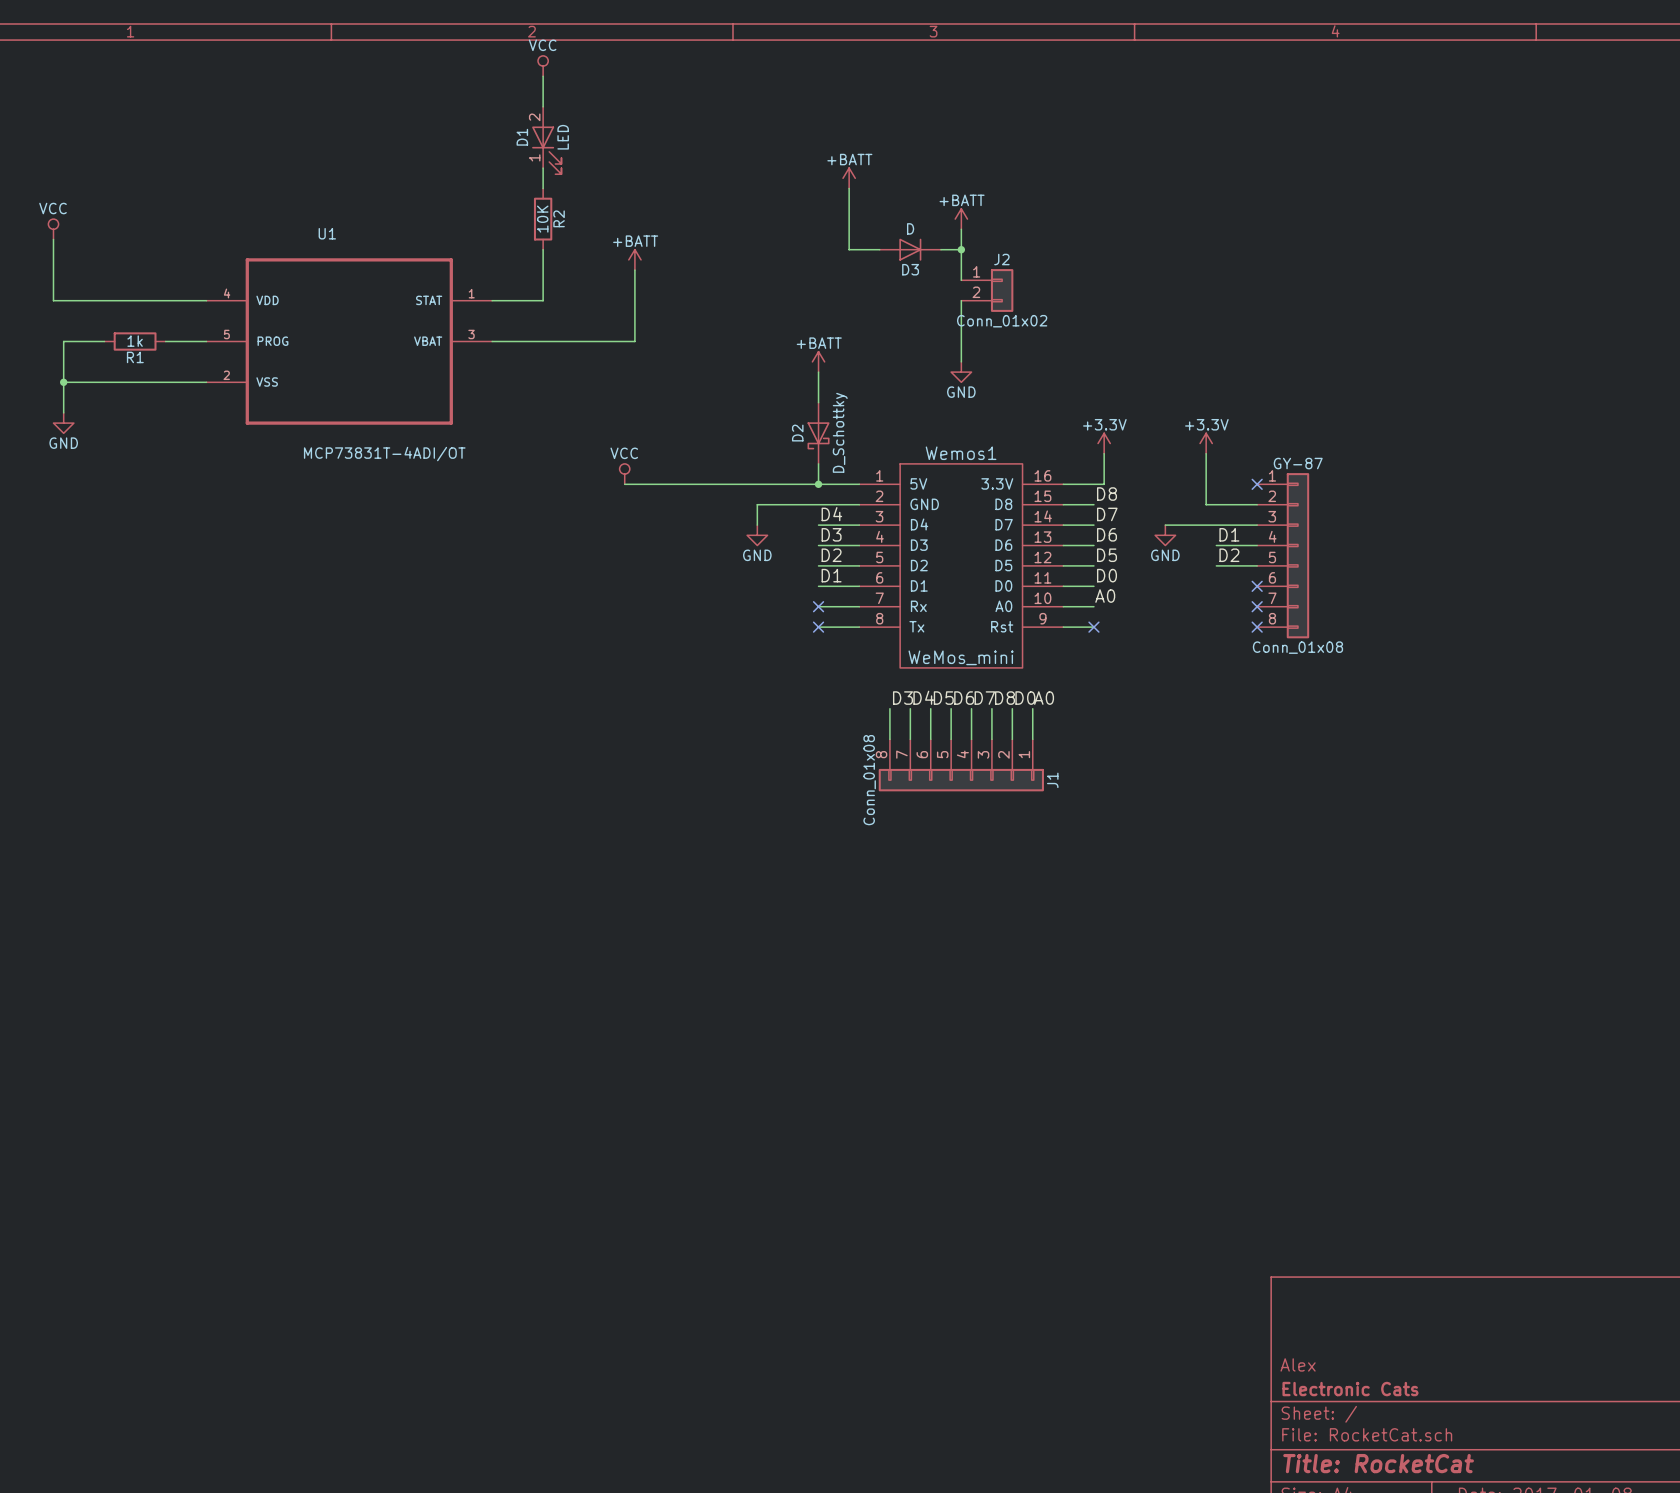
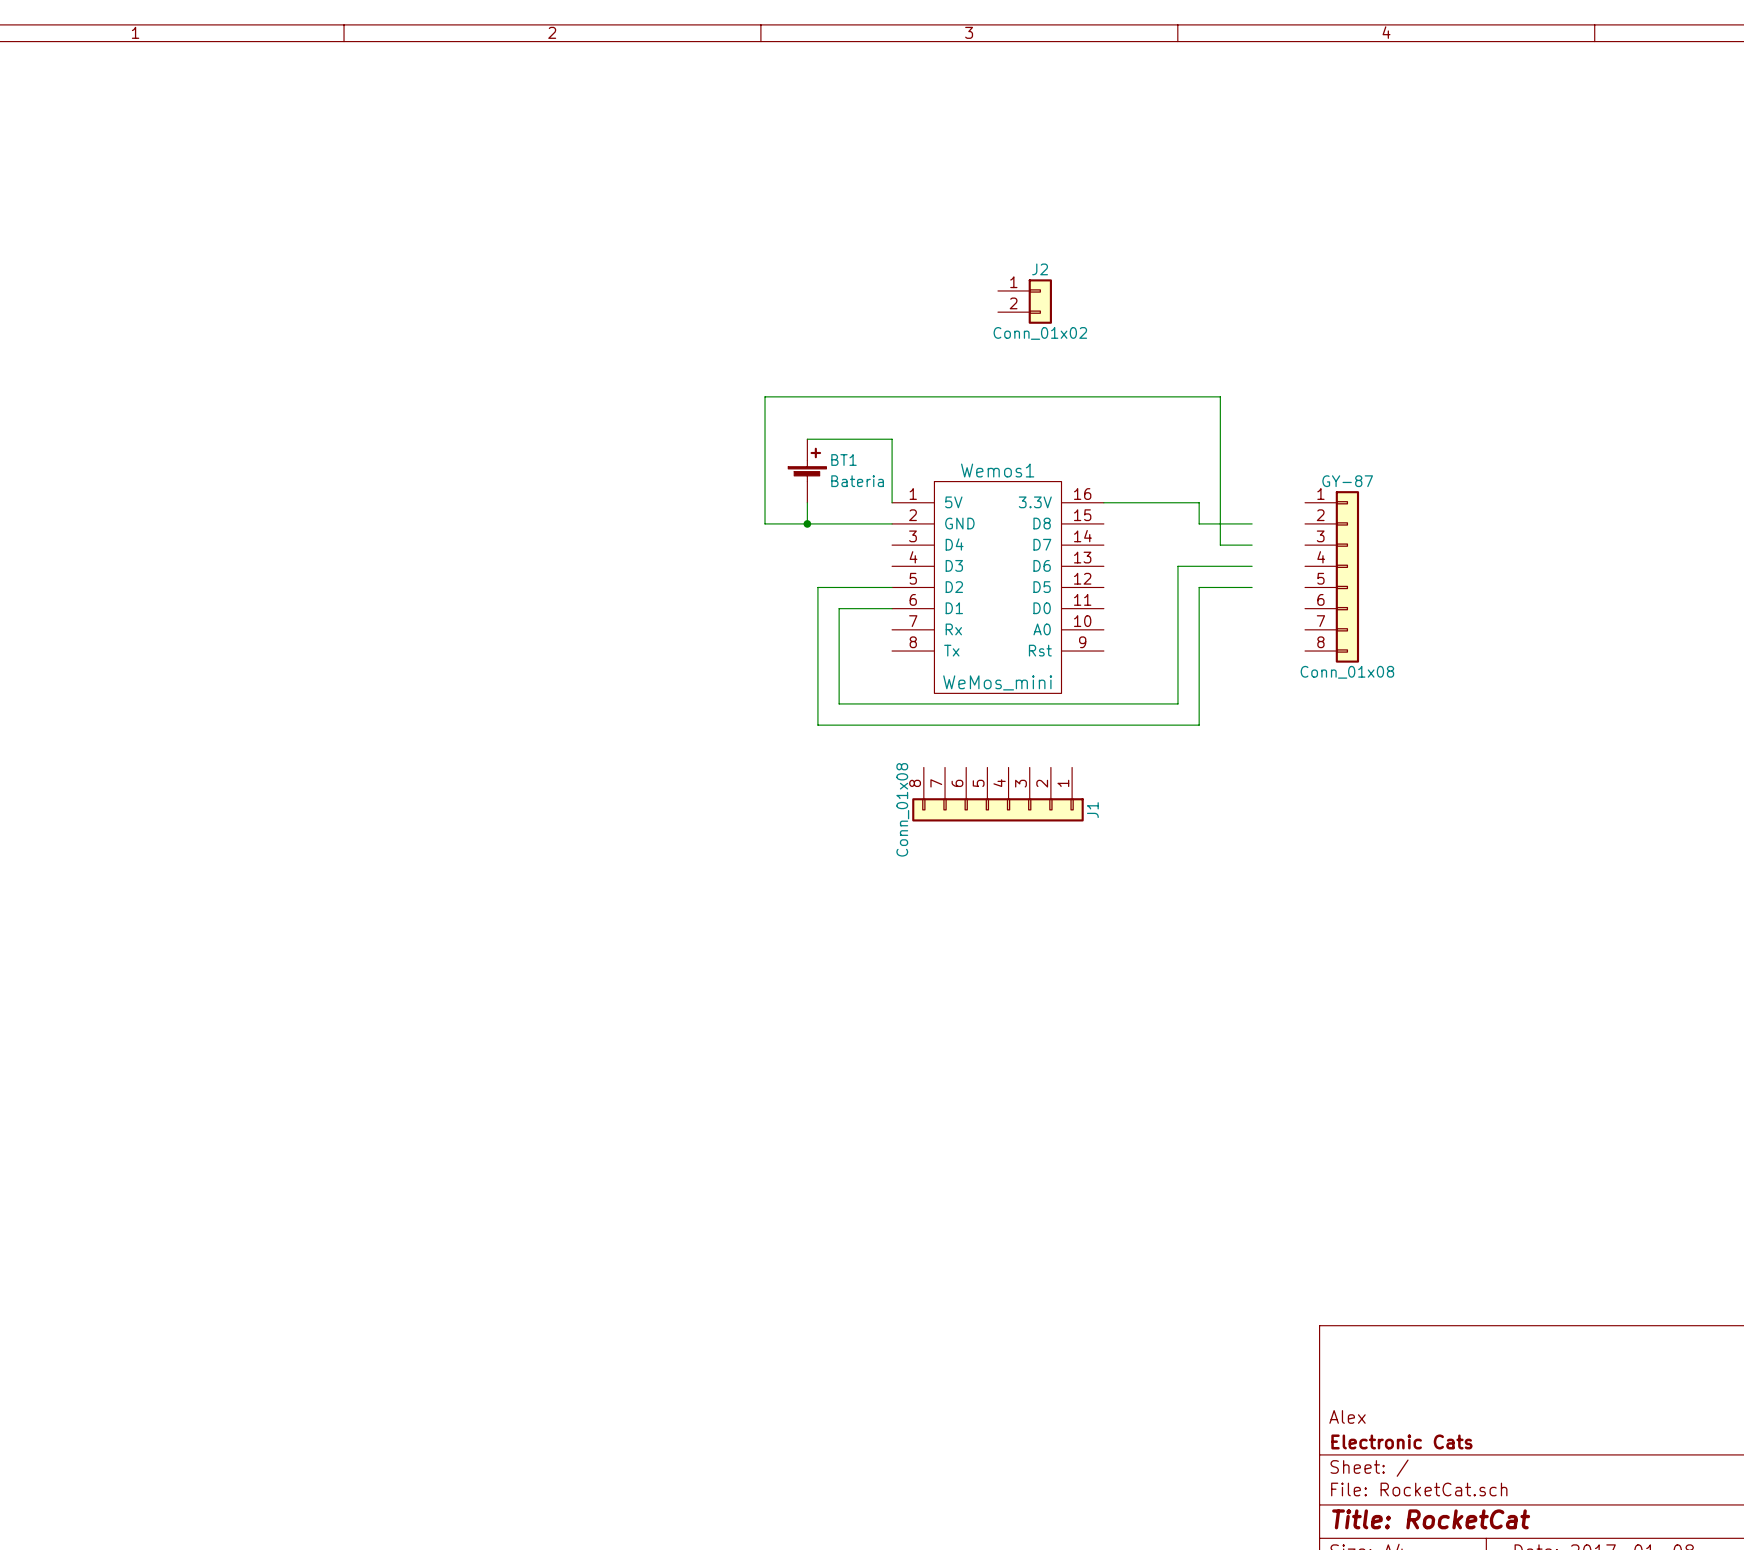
power symbol: VCC (543, 66) -> none
wire: (543, 76) (543, 106) -> none
D1: LED (546, 140) -> none
wire: (543, 168) (543, 188) -> none
power symbol: +BATT (849, 178) -> none
wire: (849, 188) (849, 249) (879, 249) -> none
R2: 10K (543, 219) -> none
power symbol: +BATT (961, 219) -> none
power symbol: VCC (53, 229) -> none
wire: (961, 229) (961, 280) -> none
wire: (53, 239) (53, 300) (206, 300) -> none
wire: (543, 249) (543, 300) (492, 300) -> none
D3: D (910, 249) -> none
wire: (940, 249) (961, 249) -> none
junction: (961, 249) -> none
power symbol: +BATT (634, 259) -> none
wire: (634, 270) (634, 341) (492, 341) -> none
wire: (961, 300) (961, 361) -> none
wire: (104, 341) (63, 341) (63, 412) -> none
R1: 1k (135, 341) -> none
wire: (165, 341) (206, 341) -> none
U1: MCP73831T-4ADI/OT (349, 341) -> none
power symbol: +BATT (818, 361) -> none
wire: (818, 372) (818, 402) -> none
power symbol: GND (961, 372) -> none
wire: (63, 382) (206, 382) -> none
junction: (63, 382) -> none
power symbol: GND (63, 423) -> none
D2: D_Schottky (818, 433) -> none
power symbol: +3.3V (1104, 443) -> none
power symbol: +3.3V (1206, 443) -> none
BT1: none -> Bateria (807, 470)
wire: (1104, 453) (1104, 484) -> (1252, 523) (1199, 523) (1199, 502) (1146, 502)
wire: (1206, 453) (1206, 504) (1257, 504) -> none
wire: (818, 463) (818, 484) -> none
power symbol: VCC (624, 474) -> none
wire: (624, 484) (859, 484) -> (807, 439) (892, 439) (892, 502)
junction position: (818, 484) -> (807, 523)
no-connect mark: (1257, 484) -> none
label: D8 (1107, 494) -> none
wire: (757, 504) (757, 525) -> (807, 502) (807, 523)
wire: (1063, 504) (1093, 504) -> none
label: D4 (831, 514) -> none
label: D7 (1107, 514) -> none
wire: (818, 525) (859, 525) -> none
wire: (1063, 525) (1093, 525) -> none
wire: (1165, 525) (1175, 525) -> (786, 523) (765, 523) (765, 396) (1220, 396) (1220, 545)
wire: (1206, 525) (1257, 525) -> none
label: D3 (831, 534) -> none
label: D6 (1107, 534) -> none
label: D1 (1229, 534) -> none
power symbol: GND (757, 535) -> none
power symbol: GND (1165, 535) -> none
wire: (818, 545) (859, 545) -> none
wire: (1063, 545) (1093, 545) -> none
wire: none -> (1252, 566) (1177, 566) (1177, 703) (839, 703) (839, 608) (849, 608)
wire: (1216, 545) (1257, 545) -> none
label: D2 (831, 555) -> none
label: D5 (1107, 555) -> none
label: D2 (1229, 555) -> none
wire: none -> (849, 587) (817, 587) (817, 725) (1199, 725) (1199, 587) (1252, 587)
wire: (1063, 565) (1093, 565) -> none
wire: (1216, 565) (1257, 565) -> none
label: D1 (831, 575) -> none
label: D0 (1107, 575) -> none
wire: (1063, 586) (1093, 586) -> none
no-connect mark: (1257, 586) -> none
label: A0 (1105, 596) -> none
wire: (818, 606) (859, 606) -> none
no-connect mark: (818, 606) -> none
wire: (1063, 606) (1093, 606) -> none
no-connect mark: (1257, 606) -> none
wire: (818, 627) (859, 627) -> none
no-connect mark: (818, 627) -> none
wire: (1063, 627) (1093, 627) -> none
no-connect mark: (1093, 627) -> none
no-connect mark: (1257, 627) -> none
label: D4 (923, 697) -> none
label: D3 (902, 698) -> none
label: D5 (943, 698) -> none
label: D6 (964, 698) -> none
label: D7 (984, 698) -> none
label: D8 (1004, 698) -> none
label: D0 (1025, 698) -> none
label: A0 (1044, 698) -> none
wire: (889, 708) (889, 739) -> none
wire: (910, 708) (910, 739) -> none
wire: (930, 708) (930, 739) -> none
wire: (951, 708) (951, 739) -> none
wire: (971, 708) (971, 739) -> none
wire: (991, 708) (991, 739) -> none
wire: (1012, 708) (1012, 739) -> none
wire: (1032, 708) (1032, 739) -> none

